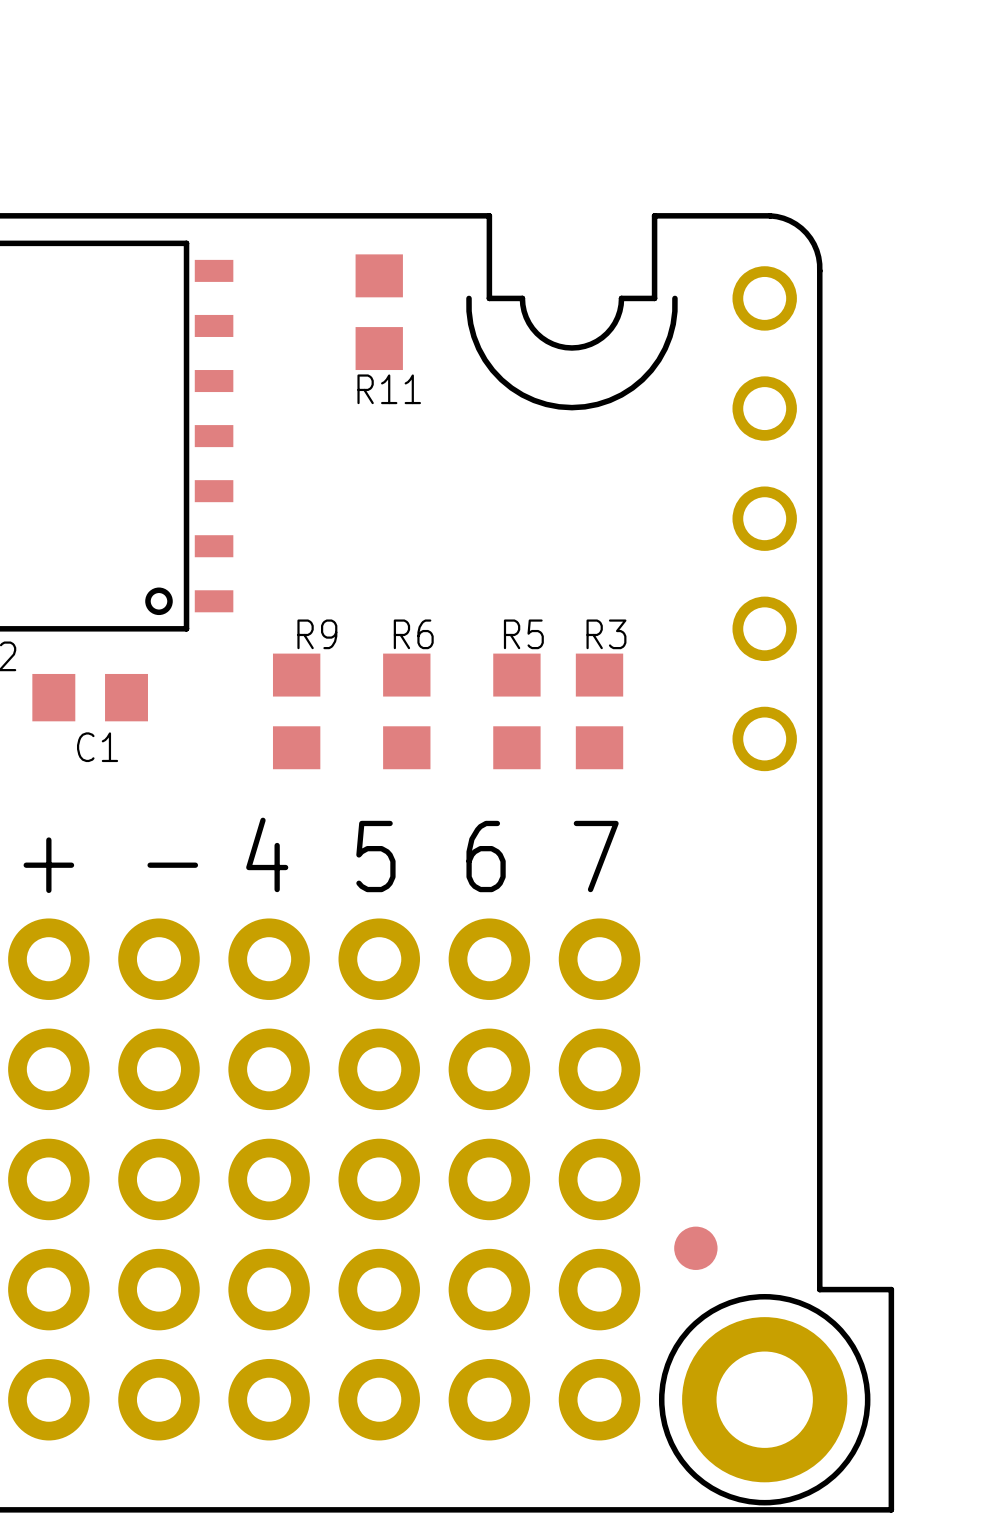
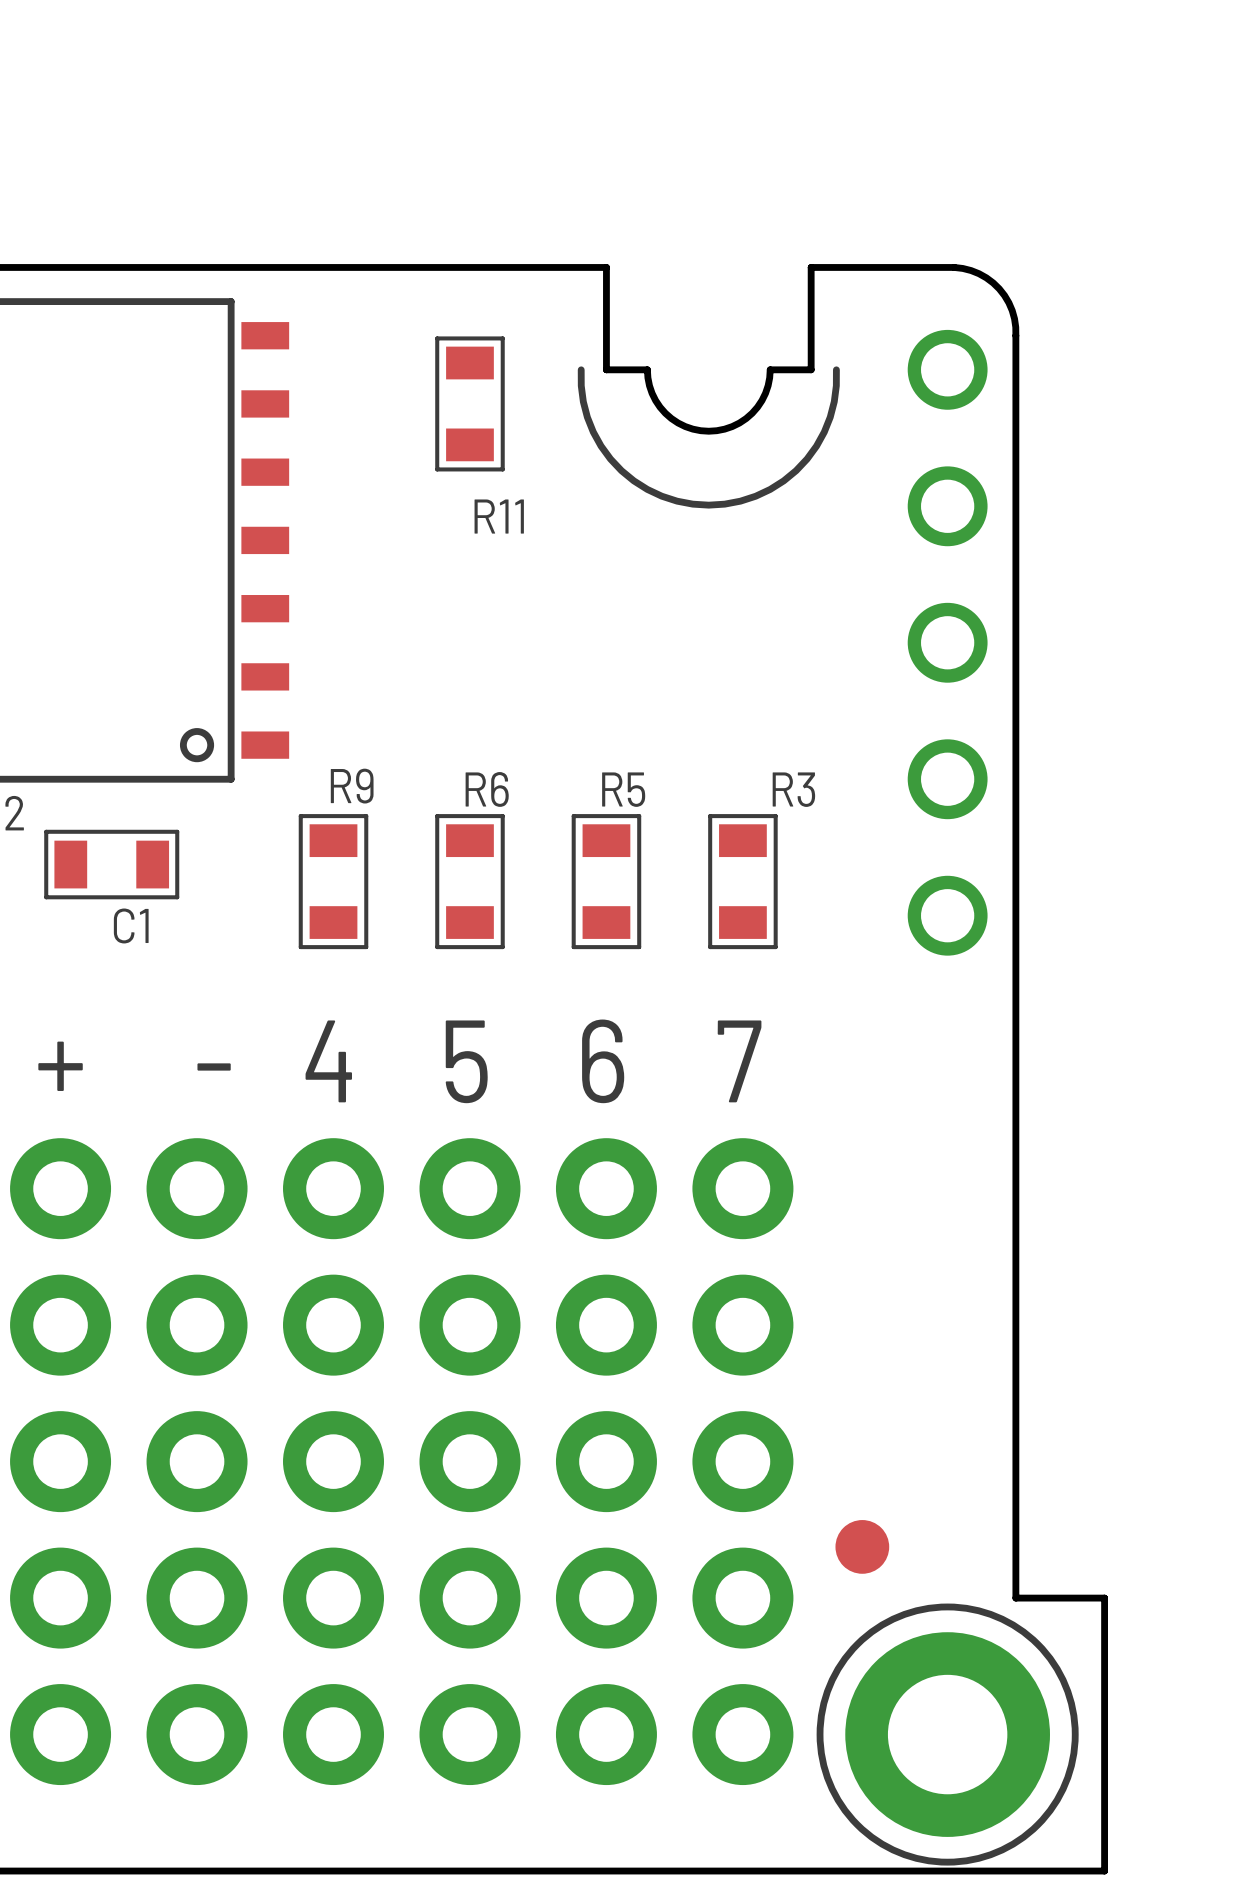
R11 footprint: [355, 254, 403, 371] -> [435, 336, 505, 472]
R9 footprint: [272, 653, 321, 770] -> [298, 814, 369, 950]
R6 footprint: [383, 653, 431, 770] -> [435, 814, 505, 950]
R5 footprint: [493, 653, 541, 770] -> [571, 814, 642, 950]
R3 footprint: [575, 653, 624, 770] -> [708, 814, 778, 950]
C1 footprint: [32, 673, 148, 722] -> [44, 829, 180, 900]

